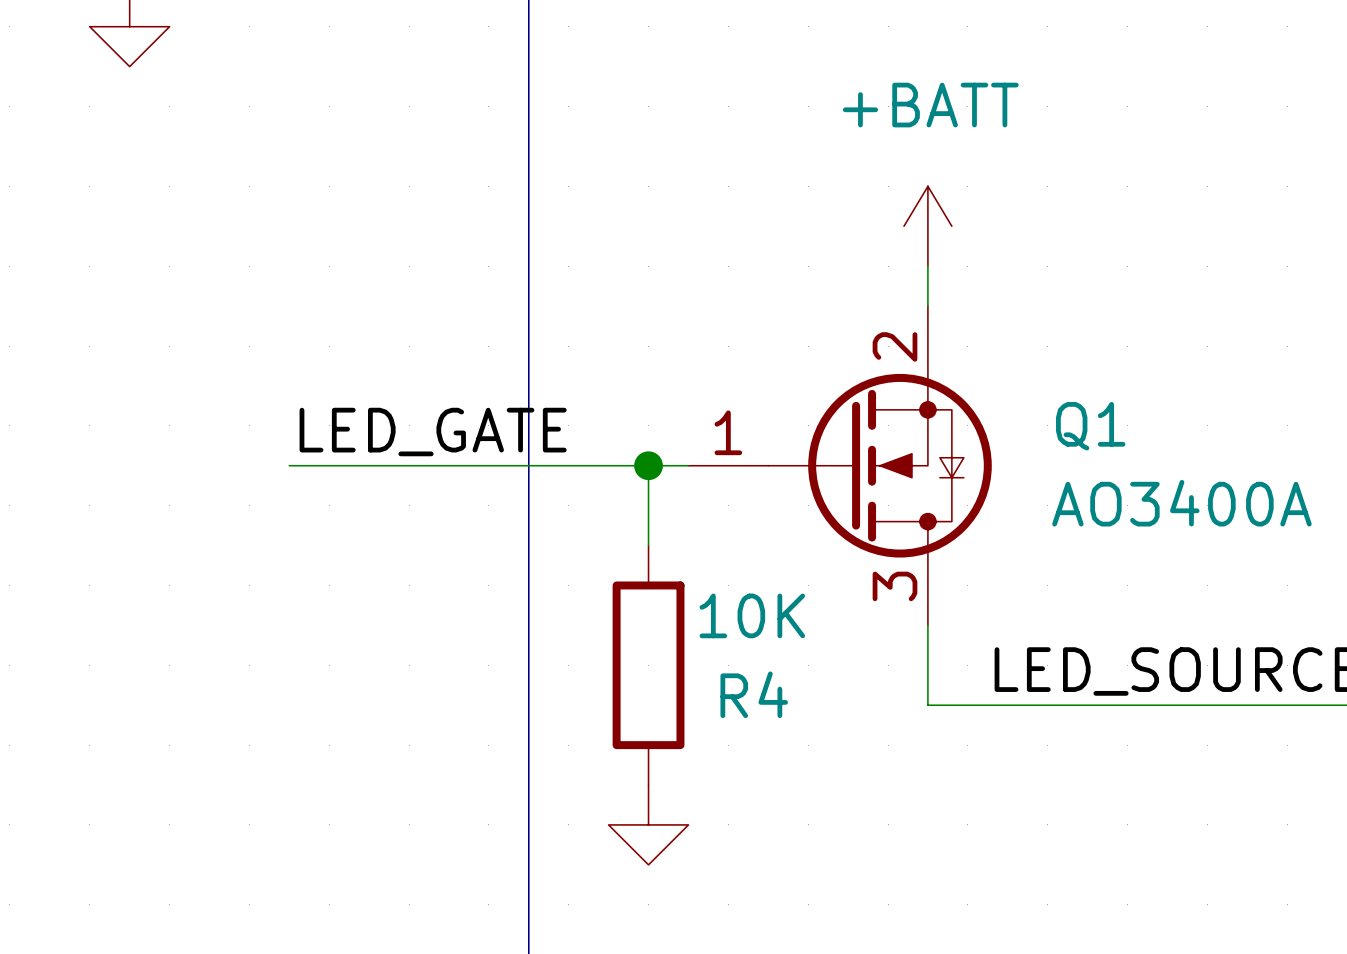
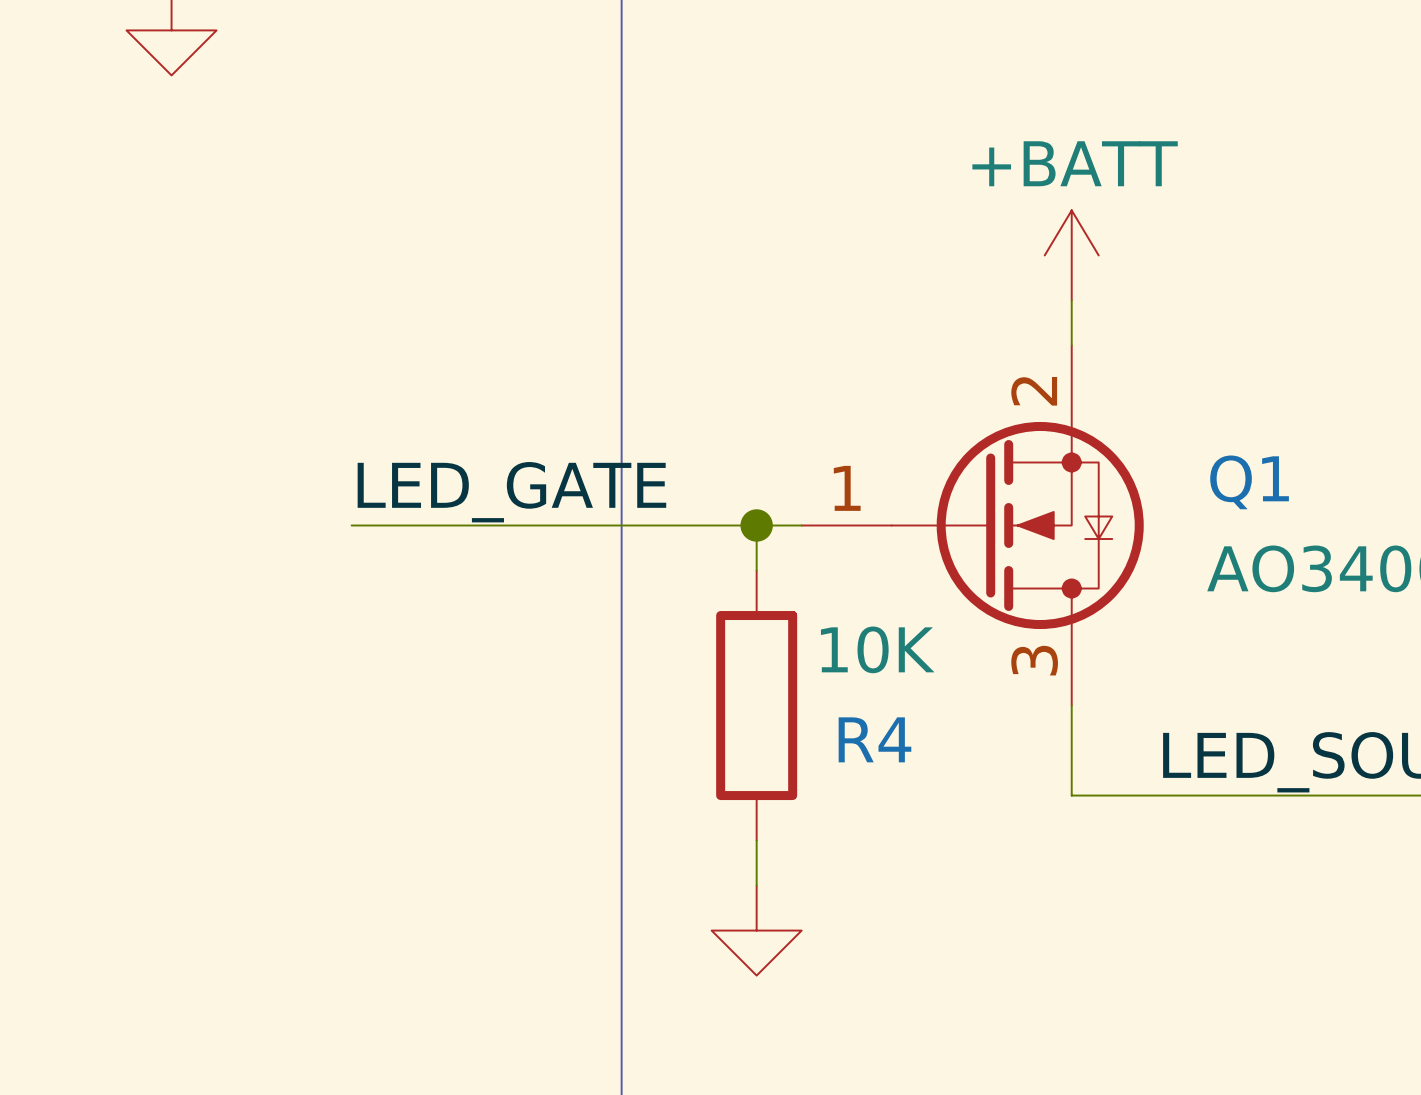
power symbol text position: +BATT (930, 105) -> +BATT (1075, 163)
R4 position: (648, 665) -> (756, 705)

